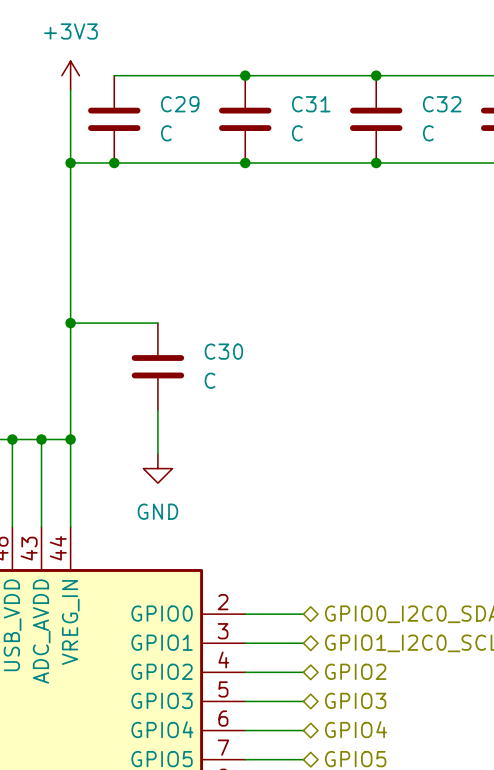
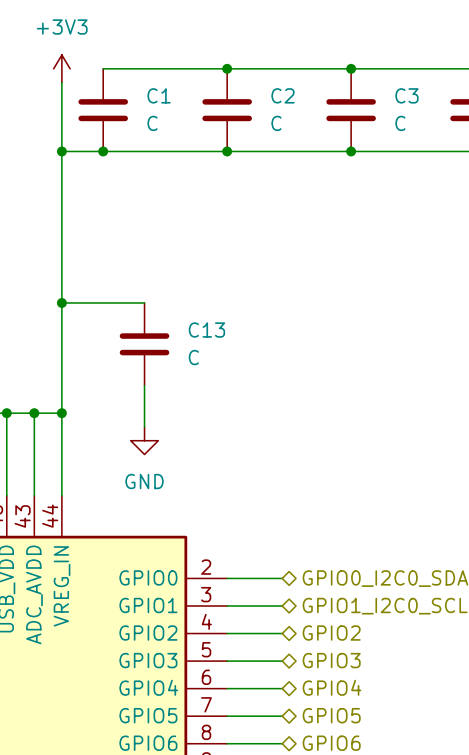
C29 name: C29 (180, 104) -> C1 (159, 95)
C31 name: C31 (311, 104) -> C2 (283, 95)
C32 name: C32 (442, 104) -> C3 (406, 95)
C30 name: C30 (223, 351) -> C13 (206, 330)

